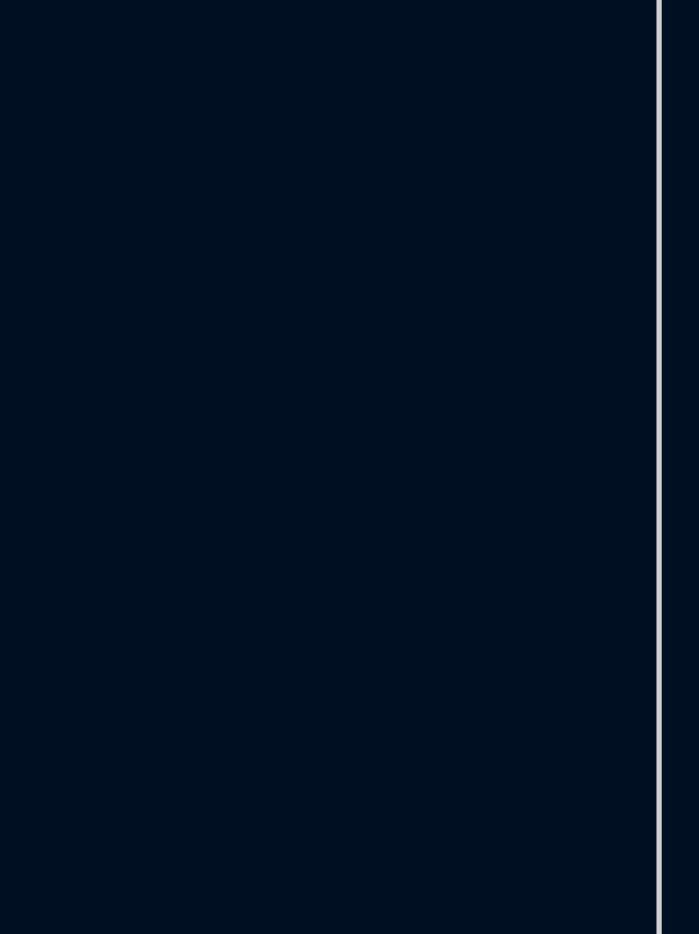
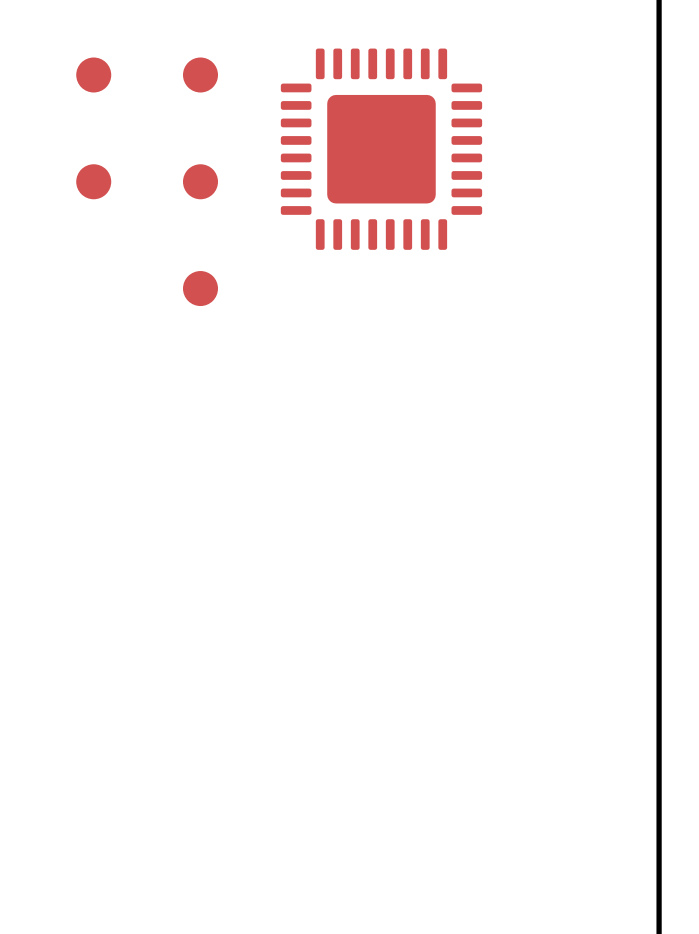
part: none -> (93, 74)
part: none -> (200, 74)
part: none -> (381, 149)
part: none -> (93, 181)
part: none -> (200, 181)
part: none -> (200, 288)

